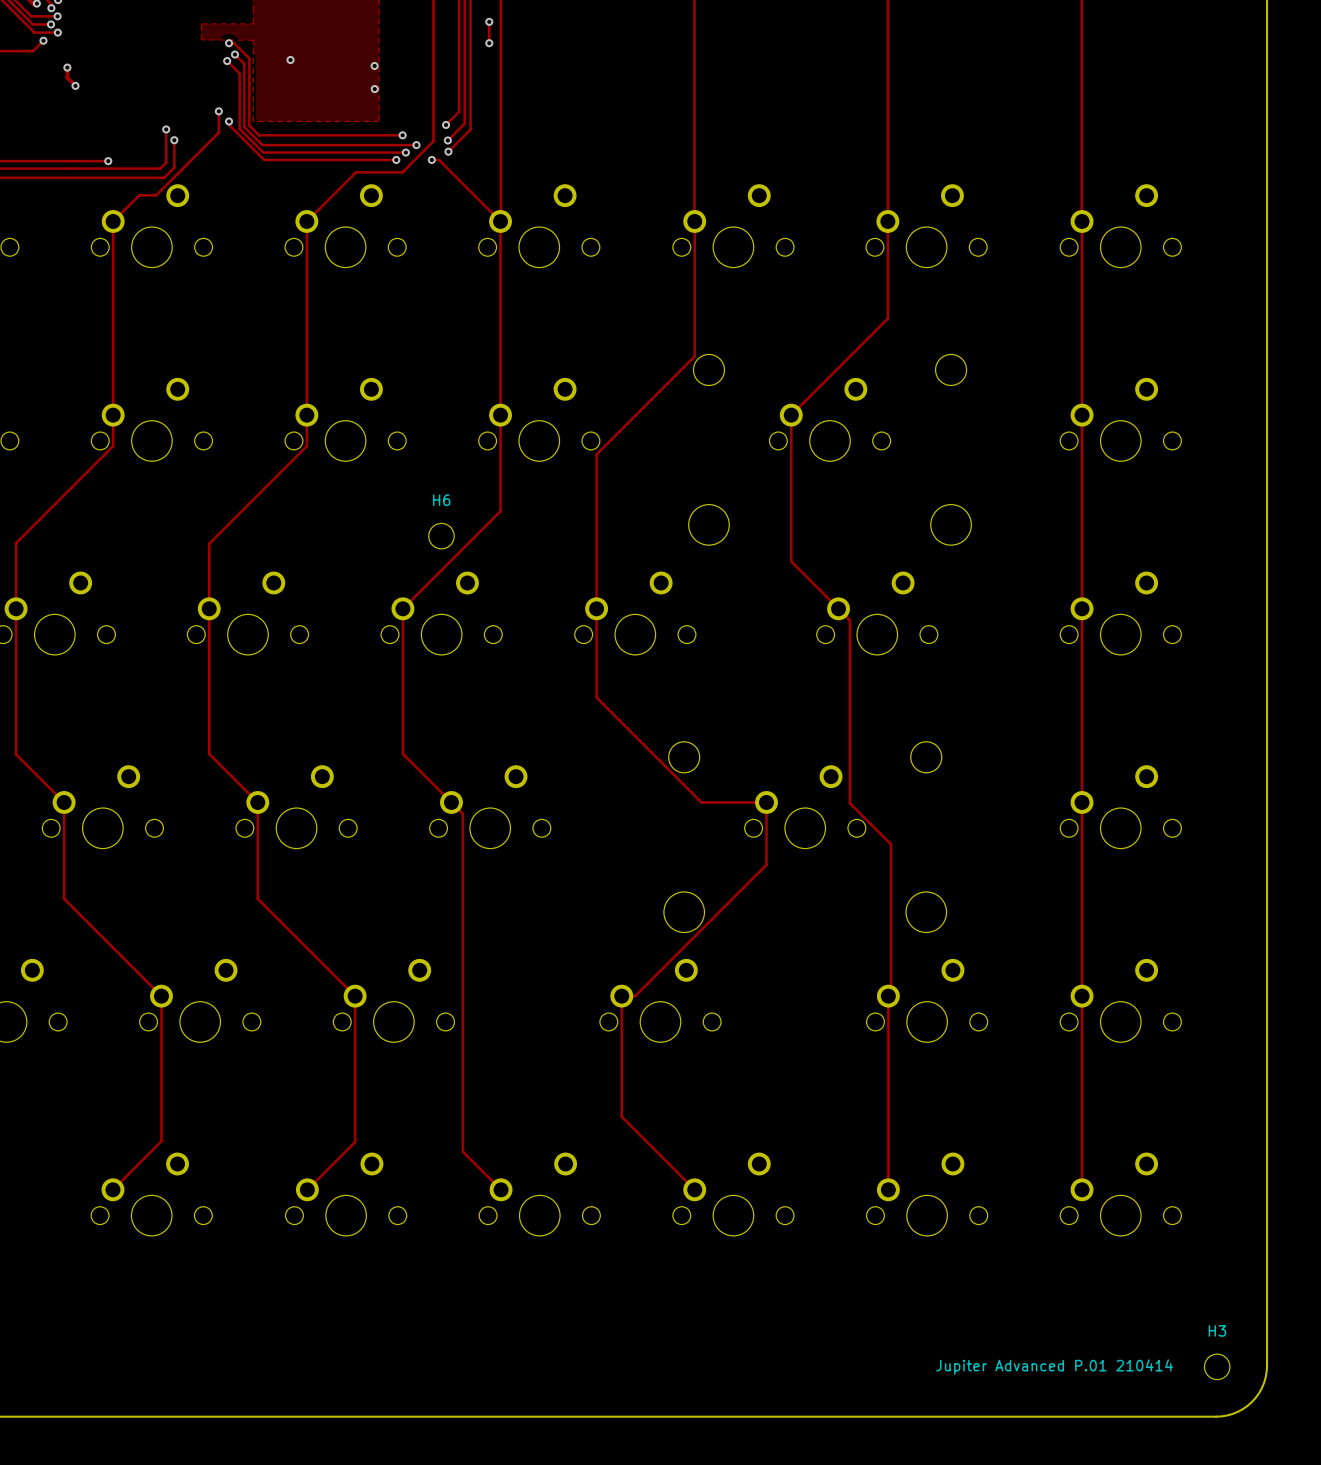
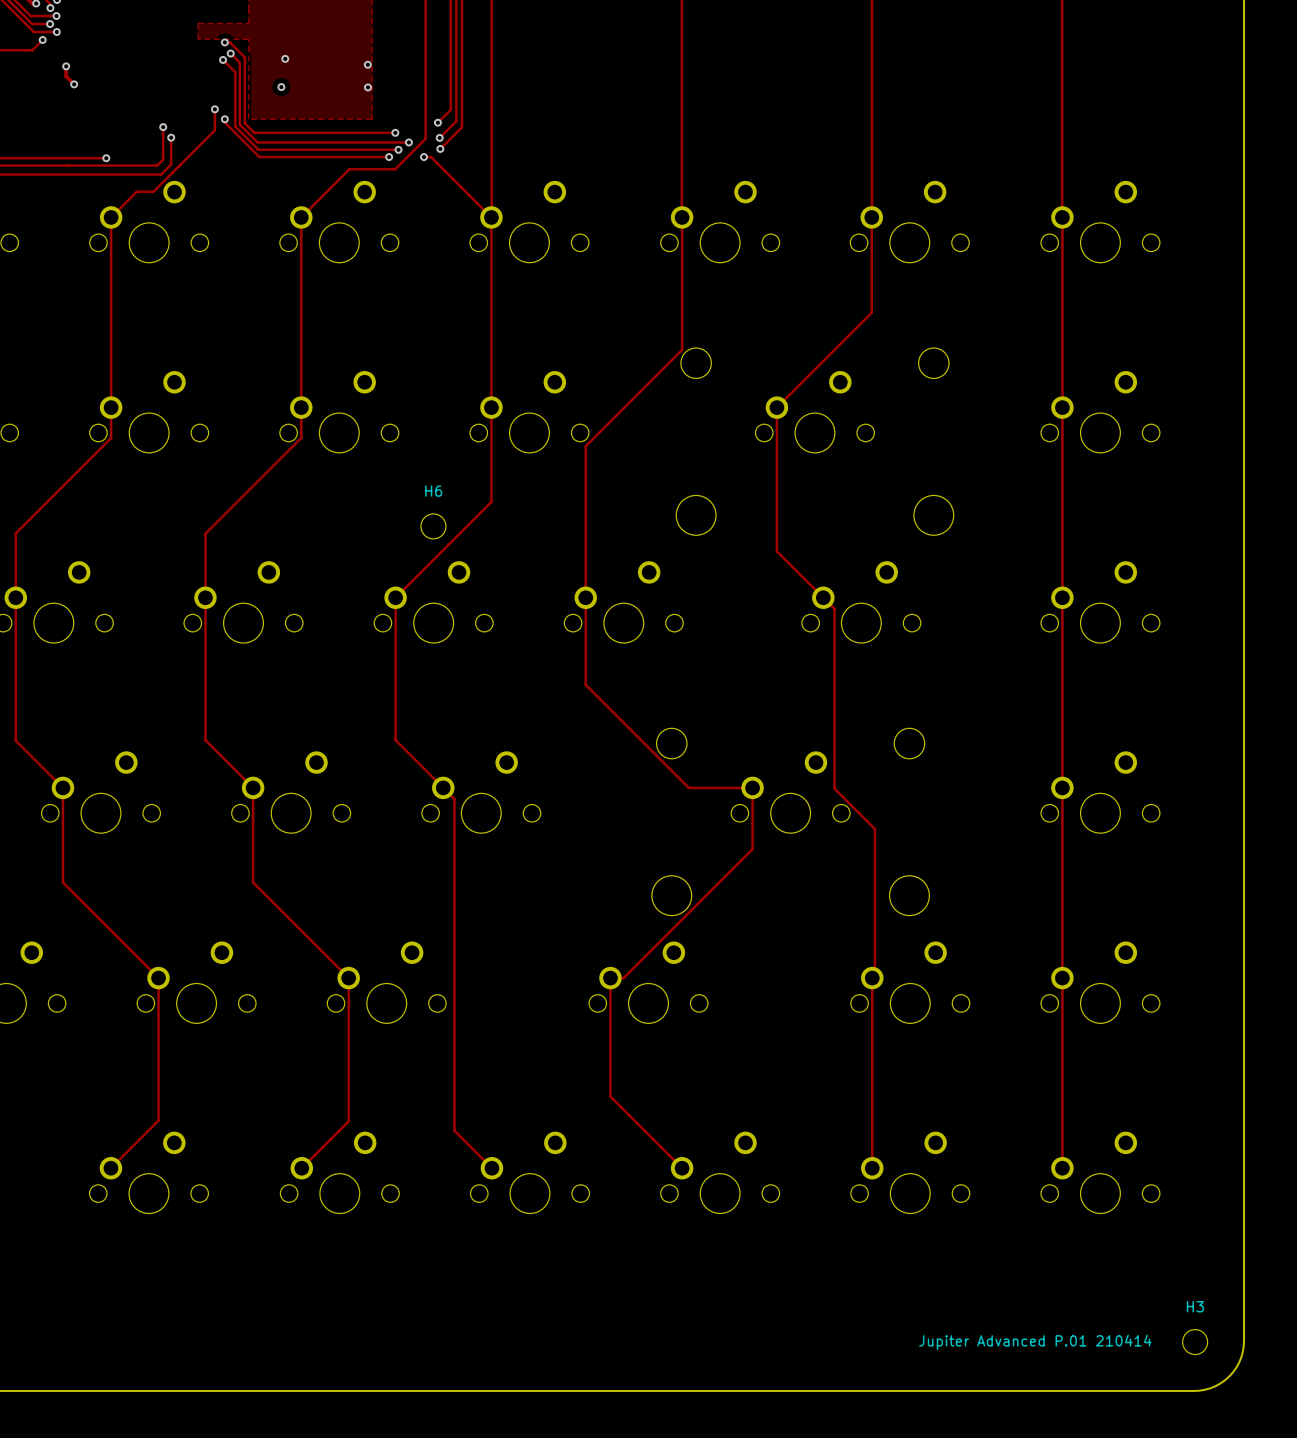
track: (489, 21) (489, 43) -> none
via: (489, 21) -> none
via: (489, 43) -> none
via: none -> (281, 87)

